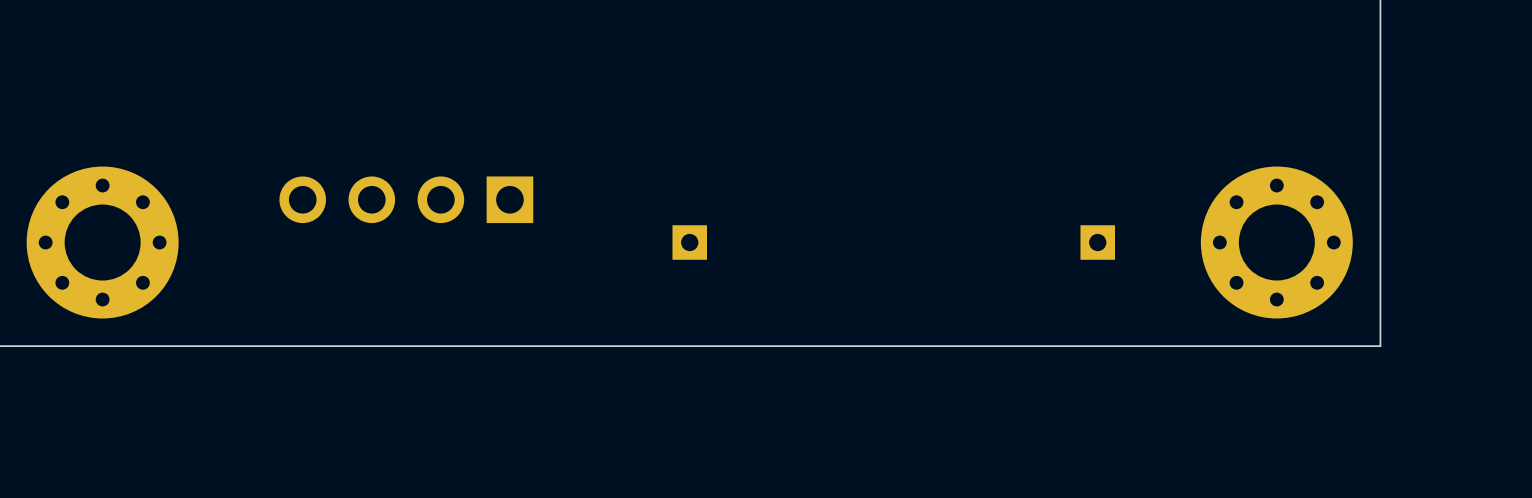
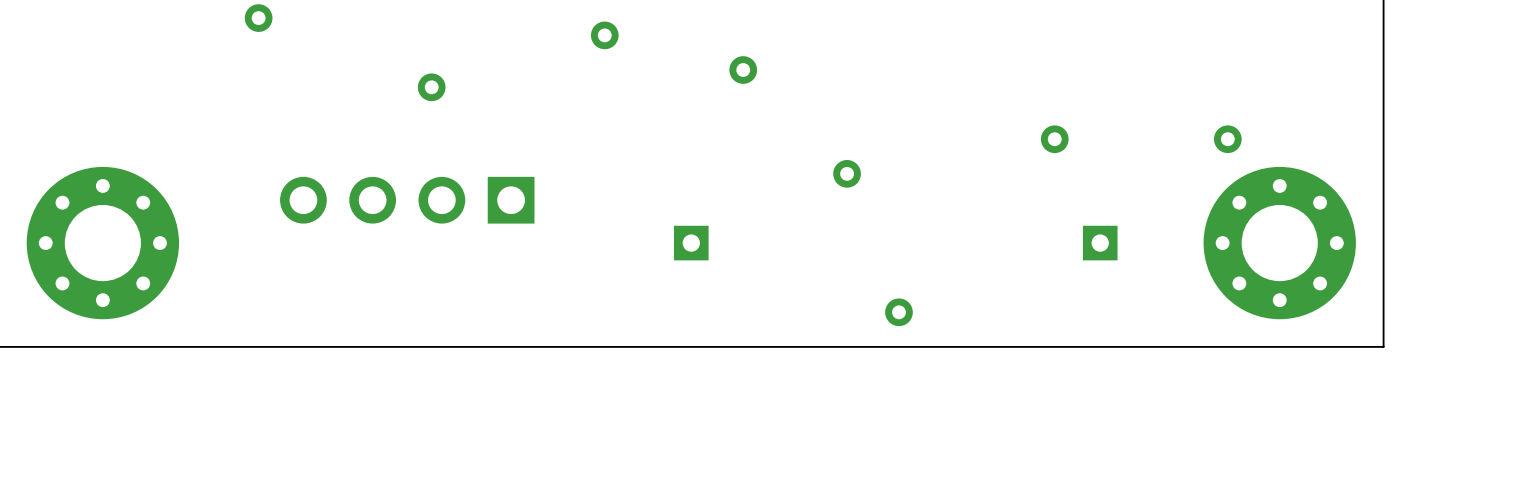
via: none -> (258, 18)
via: none -> (604, 35)
via: none -> (743, 70)
via: none -> (431, 87)
via: none -> (1054, 139)
via: none -> (1227, 139)
via: none -> (847, 173)
via: none -> (898, 312)

